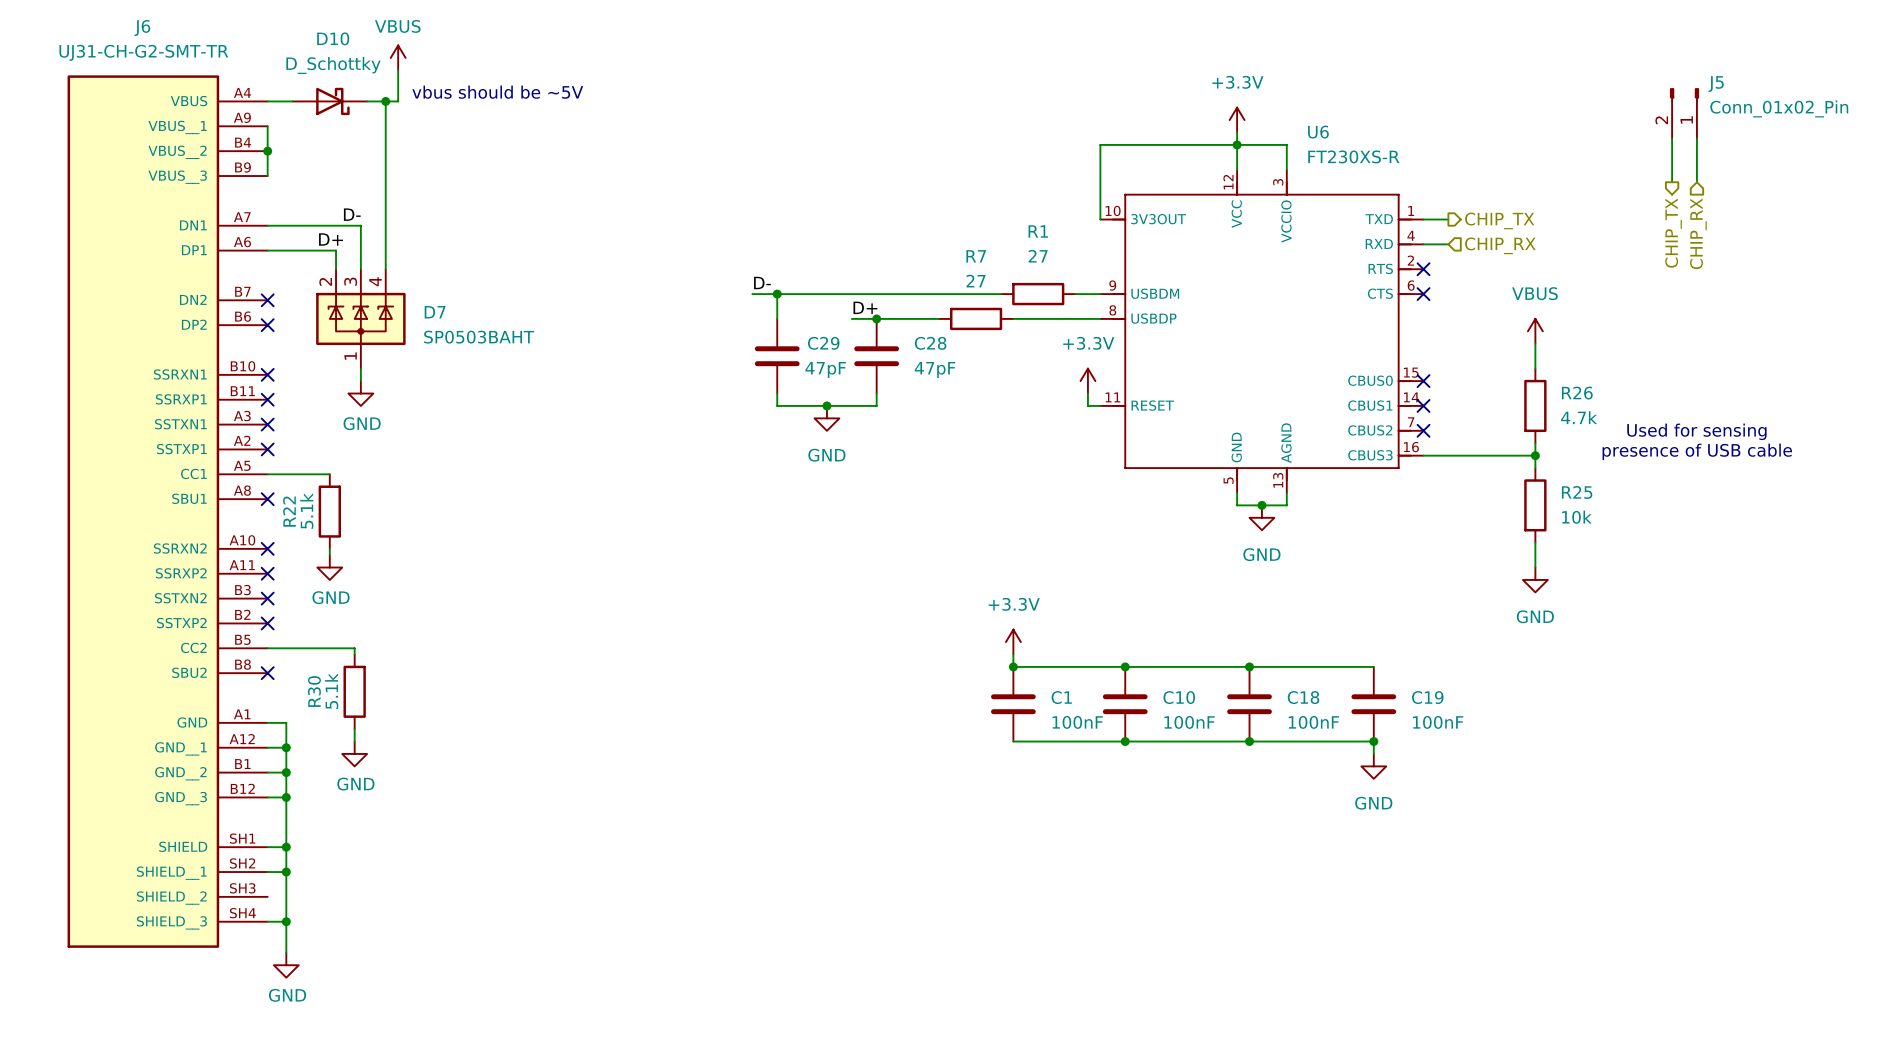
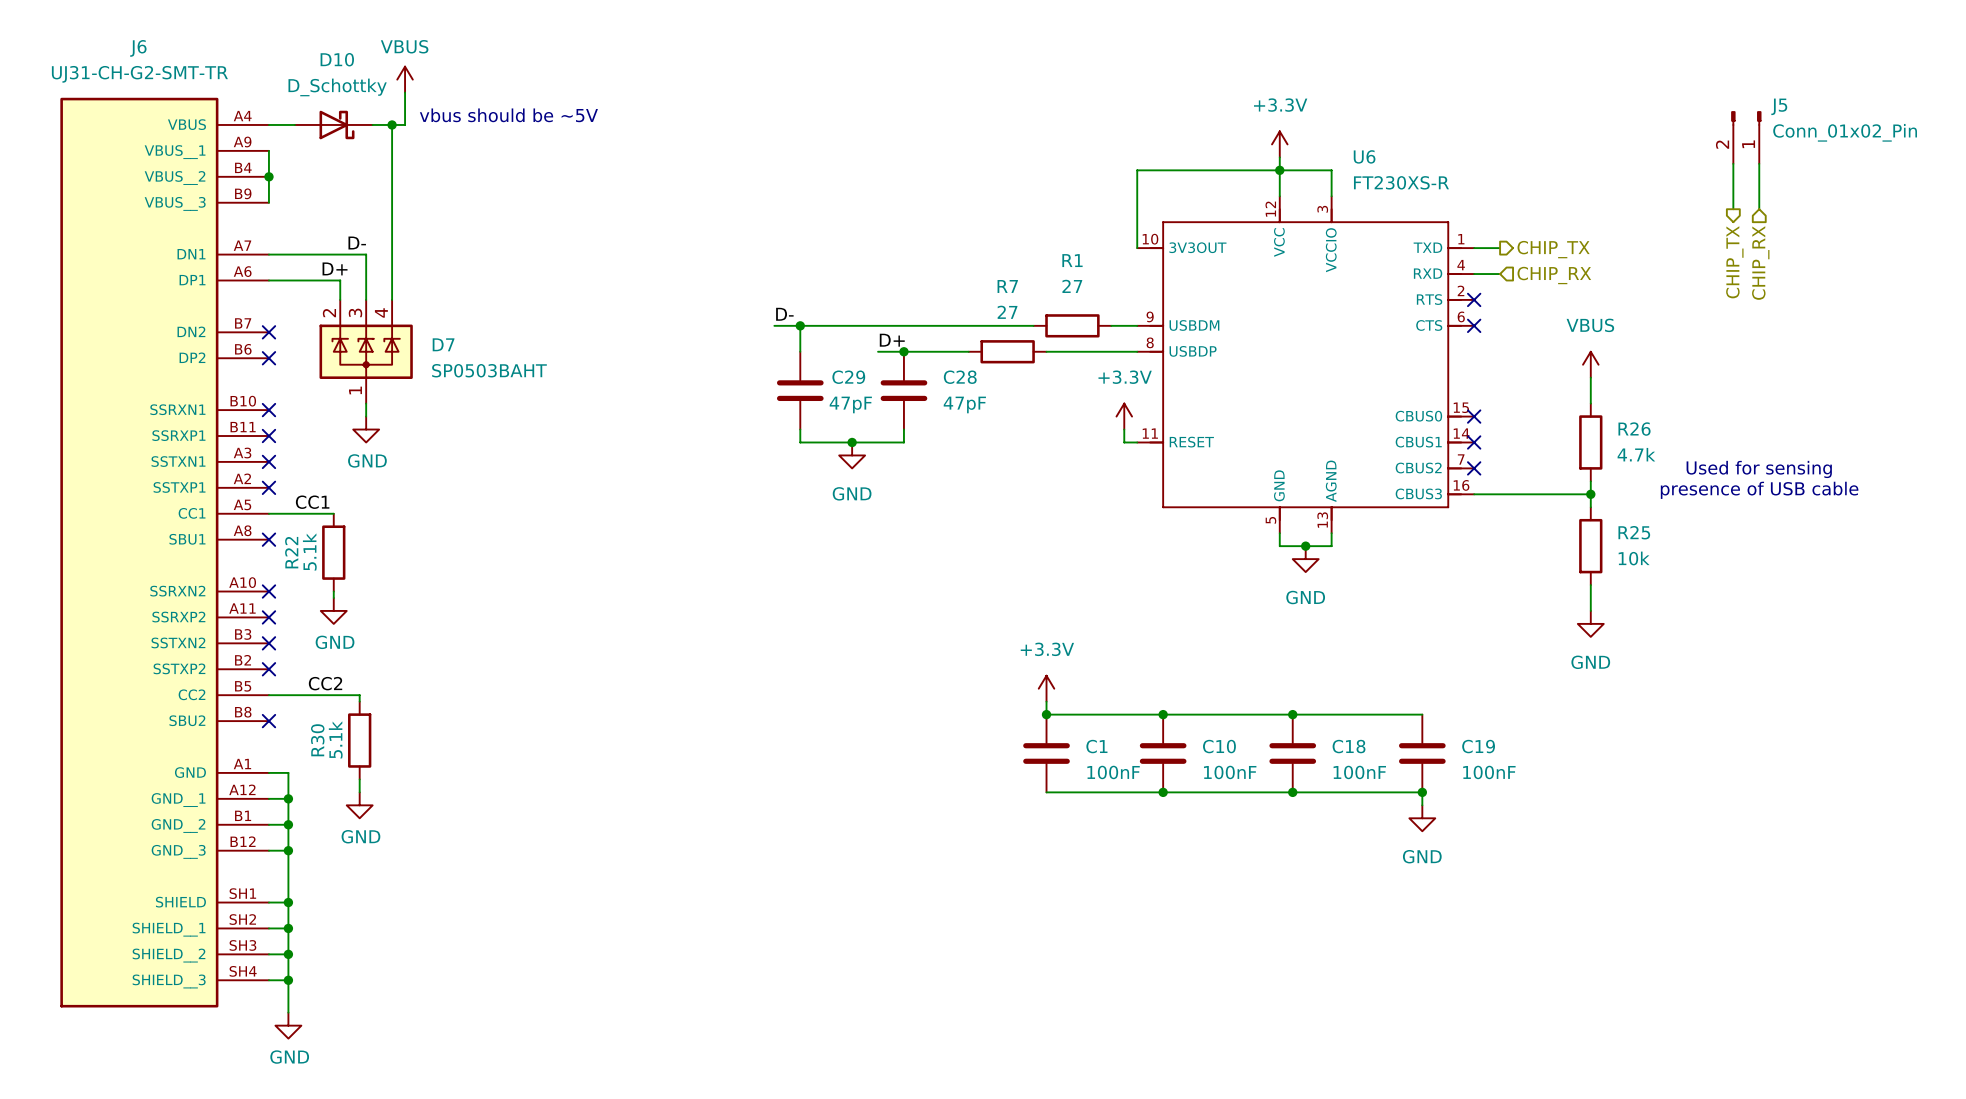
label: none -> CC1 (312, 502)
label: none -> CC2 (325, 683)
wire: none -> (268, 954) (288, 954)
junction: none -> (288, 954)

